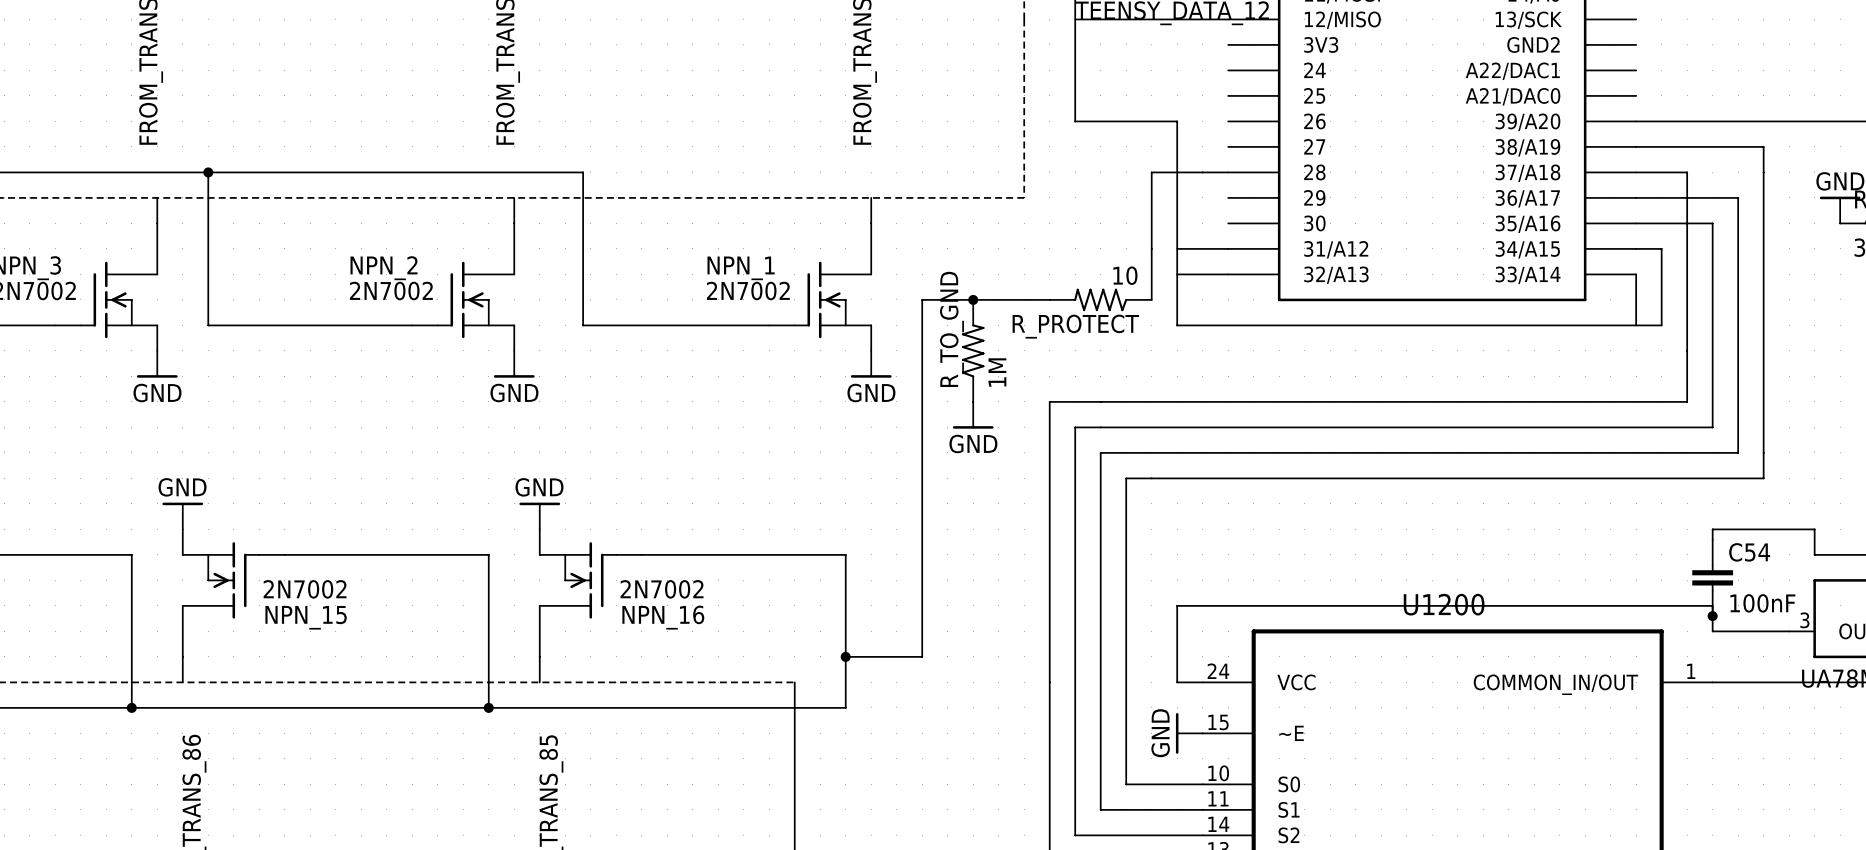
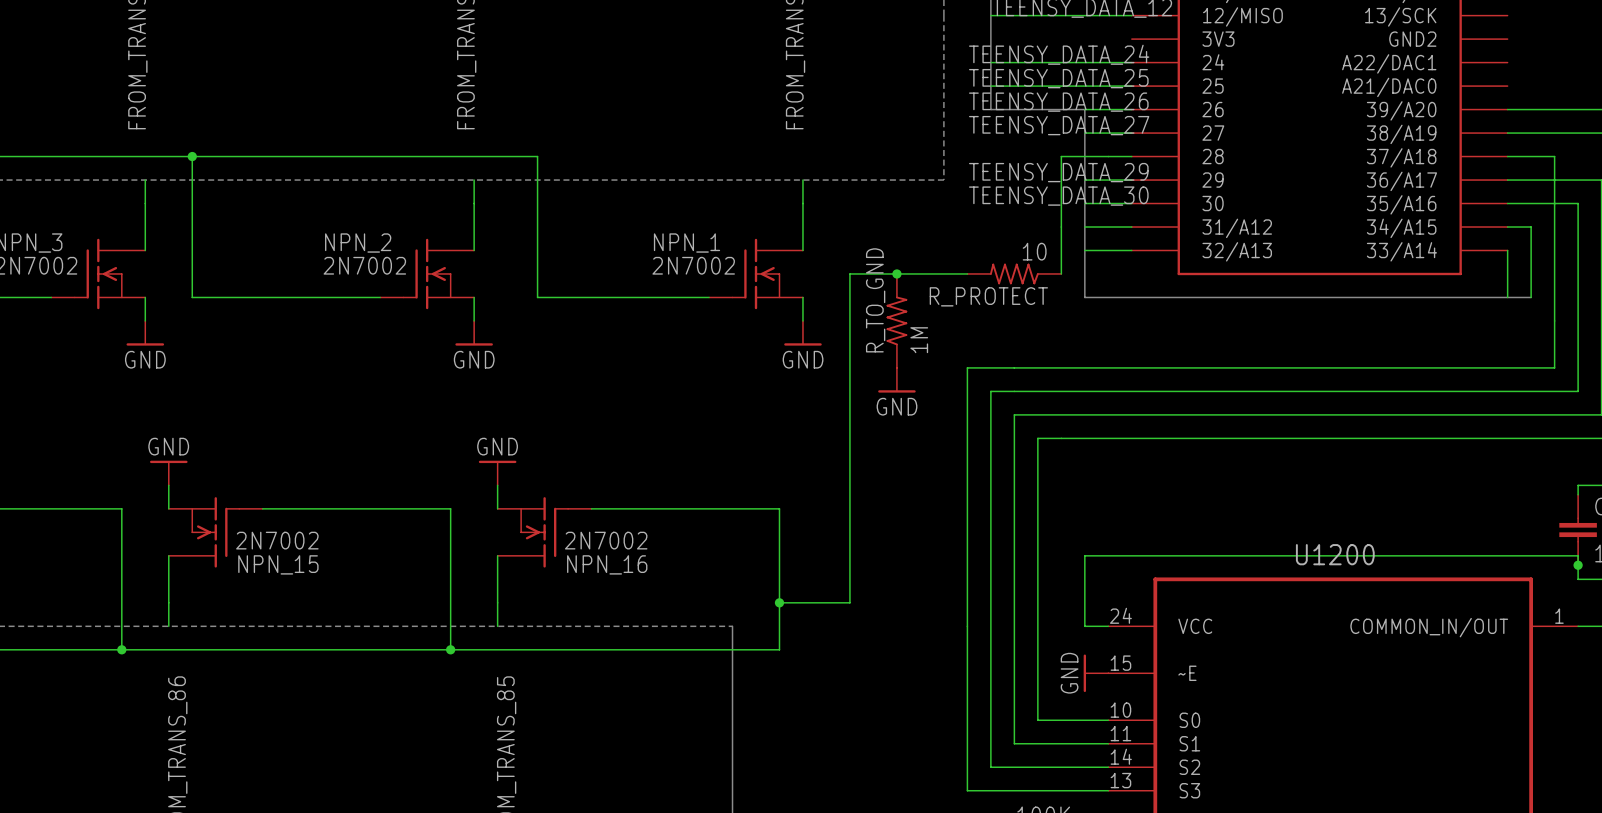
label: none -> TEENSY_DATA_24 (1059, 54)
wire: none -> (990, 62) (1131, 62)
label: none -> TEENSY_DATA_25 (1058, 78)
wire: none -> (990, 86) (1131, 86)
label: none -> TEENSY_DATA_26 (1058, 102)
wire: none -> (1084, 109) (1131, 109)
label: none -> TEENSY_DATA_27 (1059, 125)
wire: none -> (1084, 133) (1131, 133)
label: none -> TEENSY_DATA_29 (1058, 172)
wire: none -> (1084, 180) (1131, 180)
label: none -> TEENSY_DATA_30 (1058, 196)
wire: none -> (1084, 203) (1131, 203)

